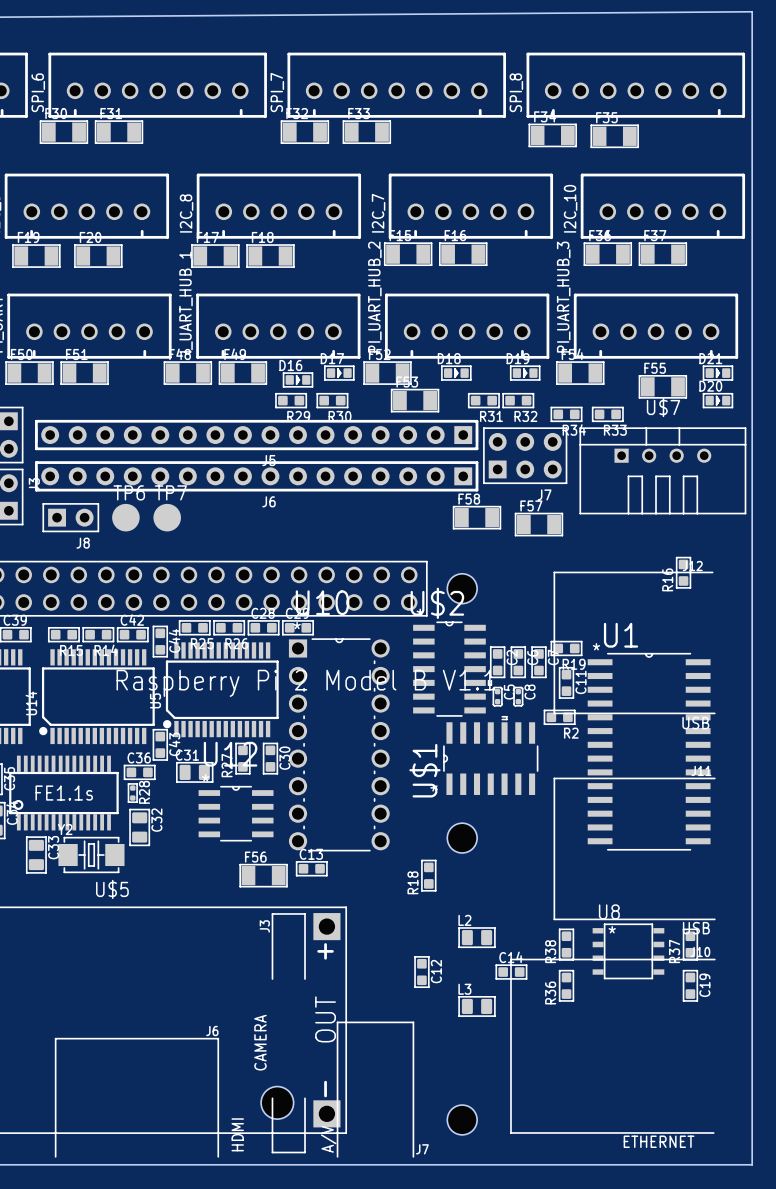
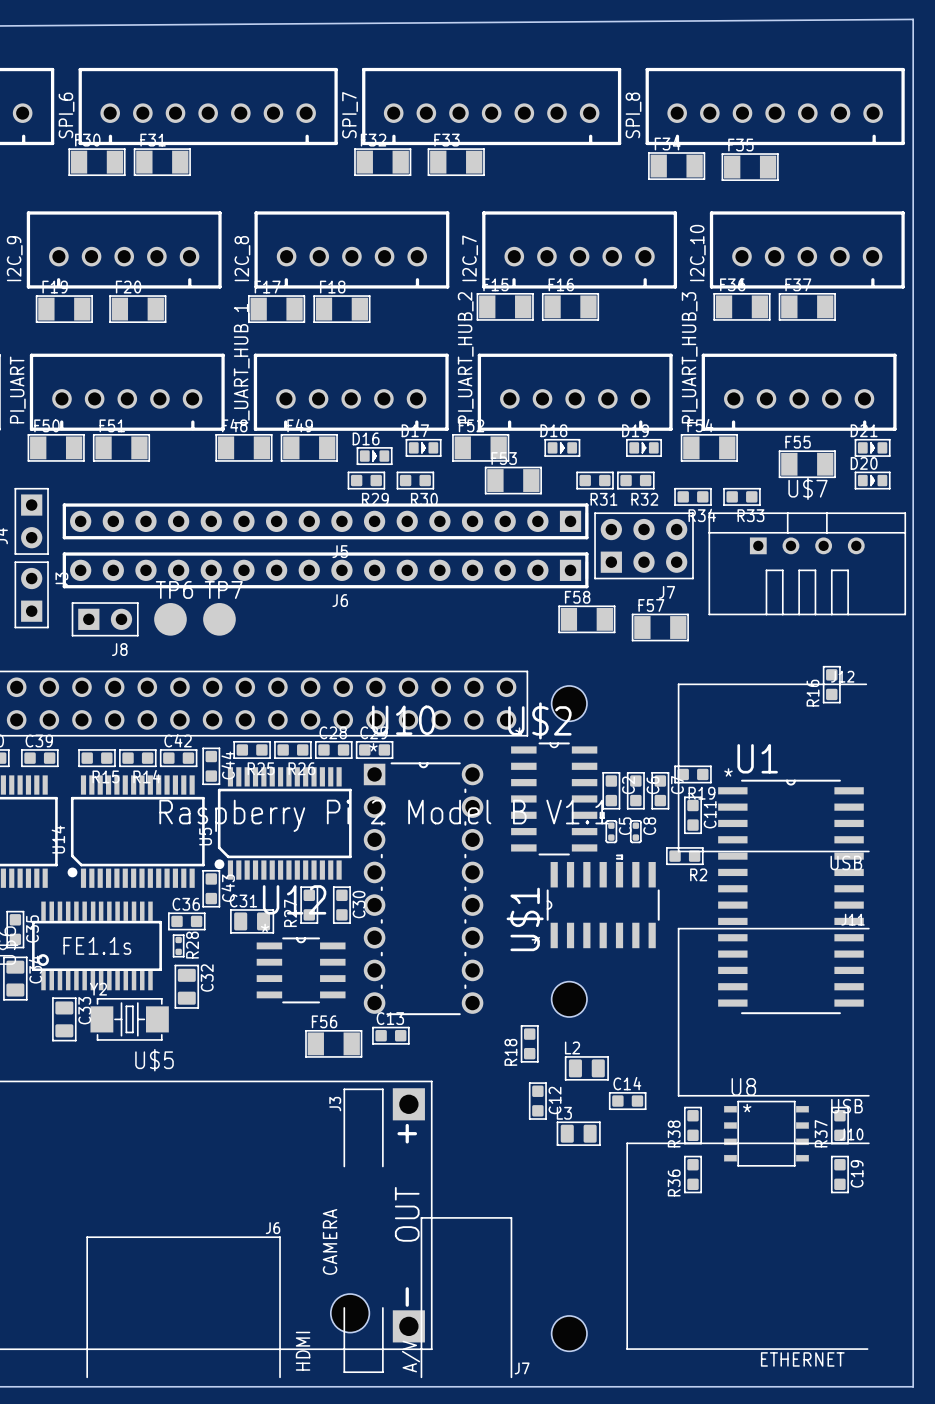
L2 position: (477, 937) -> (586, 1068)
C12 position: (421, 972) -> (537, 1101)
C14 position: (511, 972) -> (627, 1101)
L3 position: (477, 1006) -> (578, 1133)

